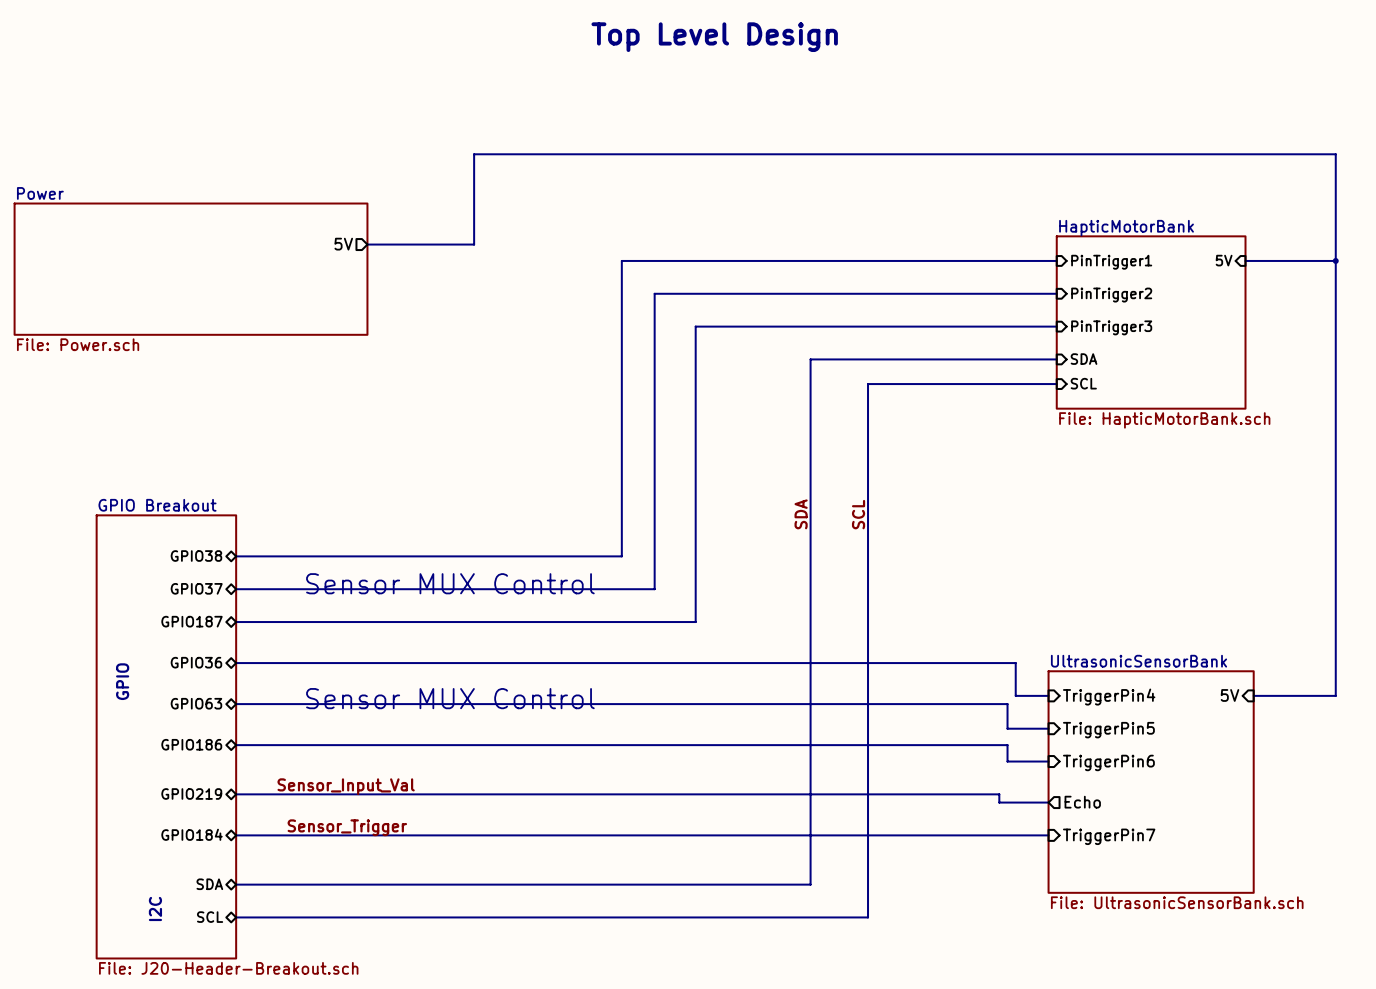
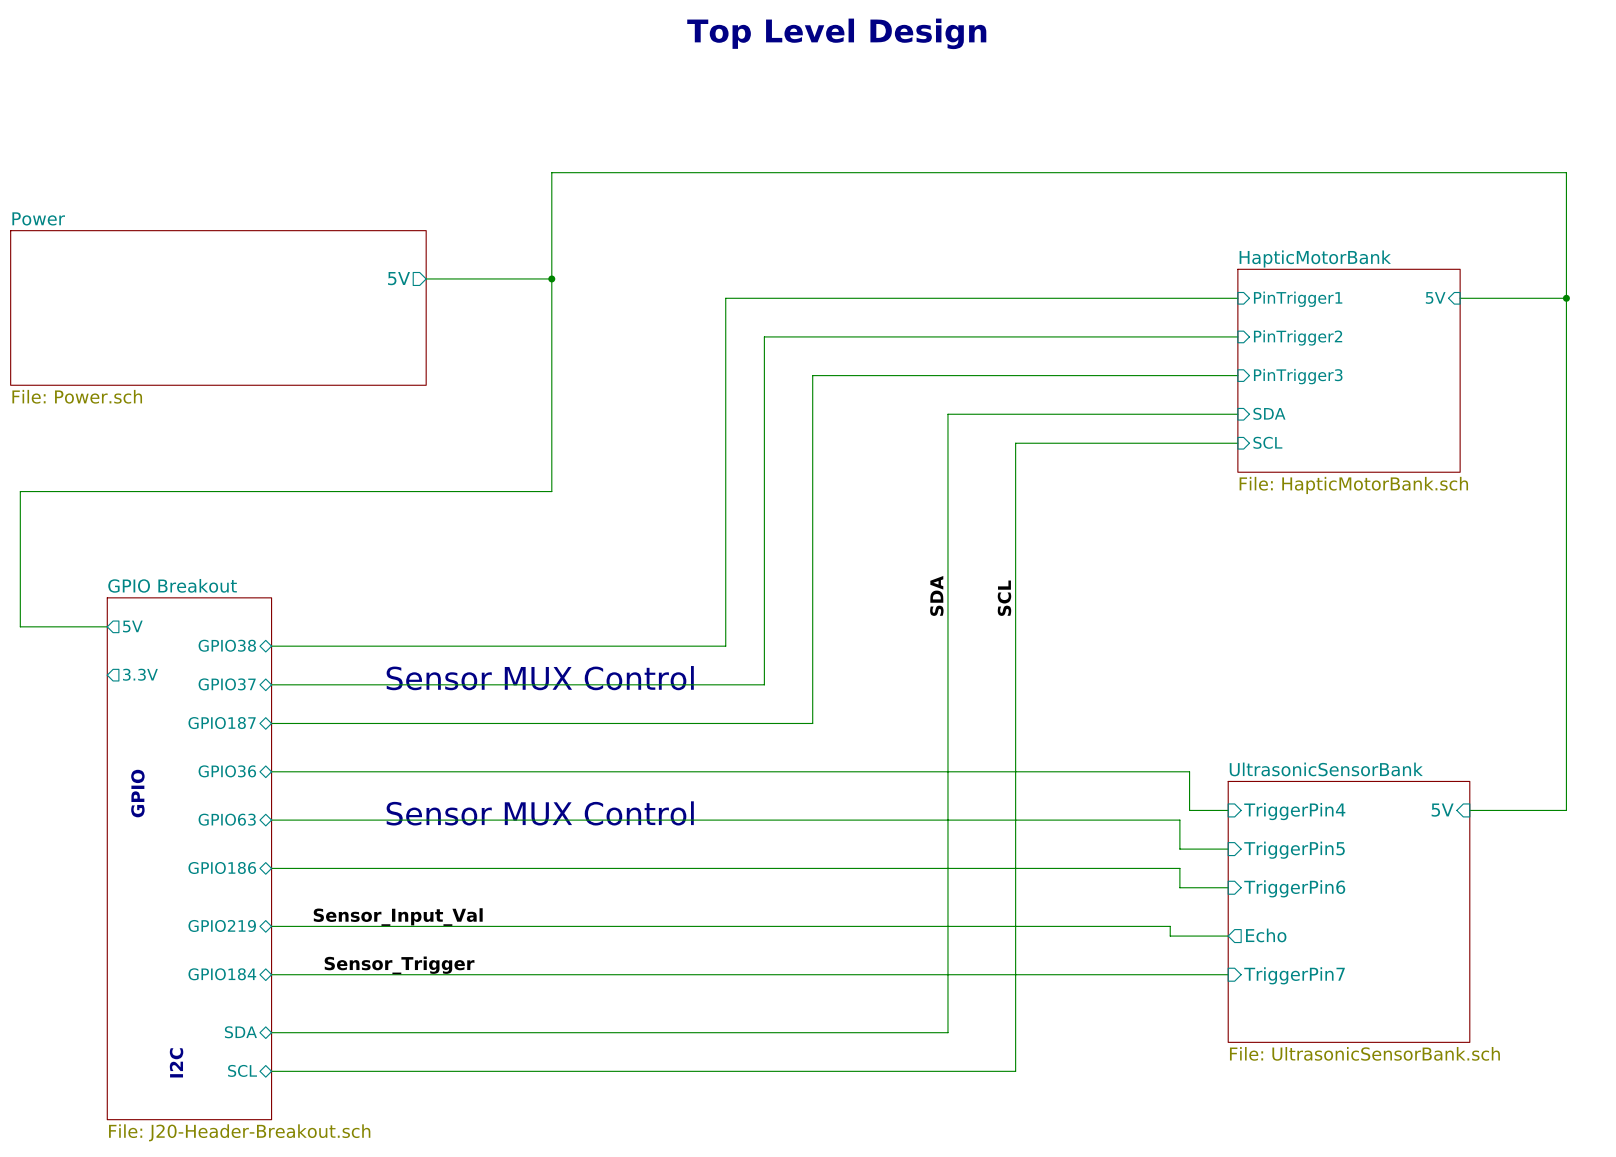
wire: none -> (551, 278) (551, 491) (20, 491) (20, 626) (107, 626)
junction: none -> (551, 278)
sheet pin: none -> 5V (132, 626)
sheet pin: none -> 3.3V (140, 674)

